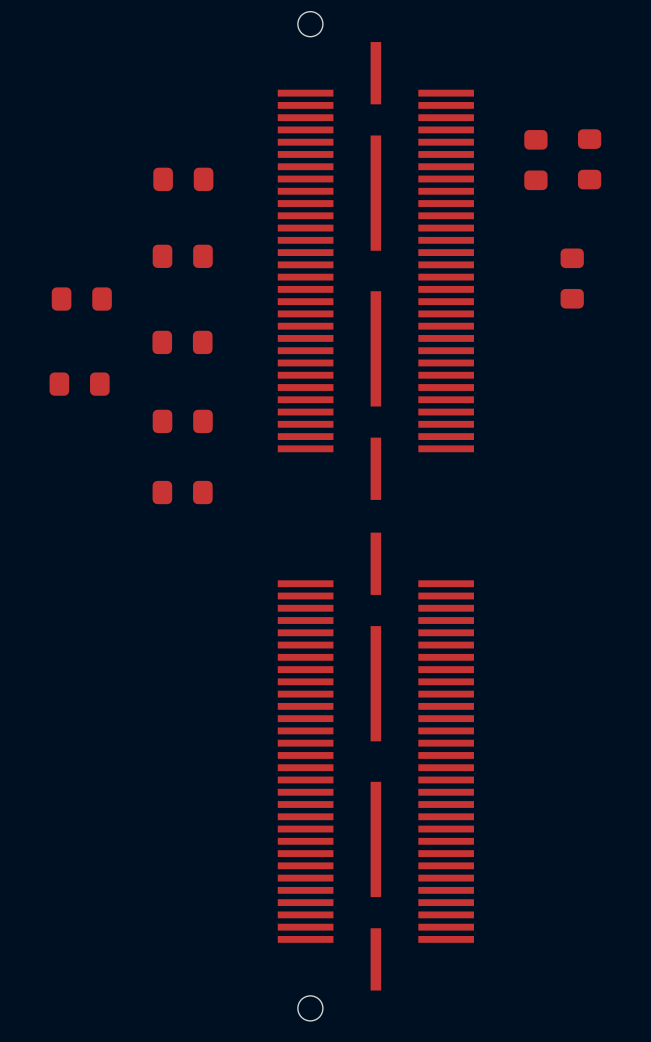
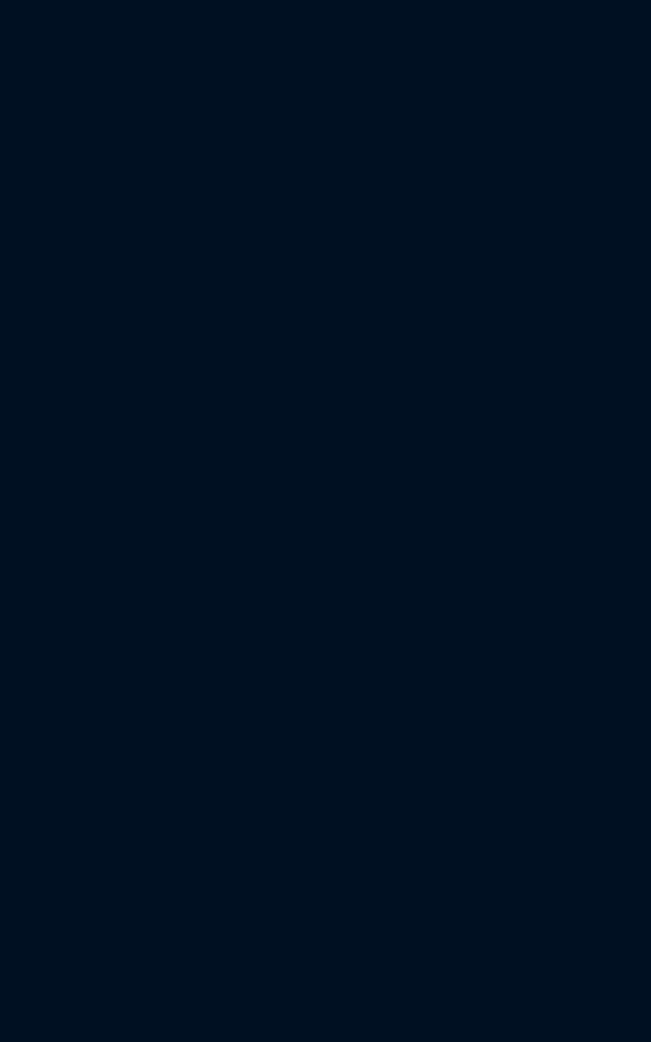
part: (589, 159) -> none
part: (535, 160) -> none
part: (183, 179) -> none
part: (182, 256) -> none
part: (572, 278) -> none
part: (81, 299) -> none
part: (182, 342) -> none
part: (79, 384) -> none
part: (182, 421) -> none
part: (182, 492) -> none
part: (375, 516) -> none

